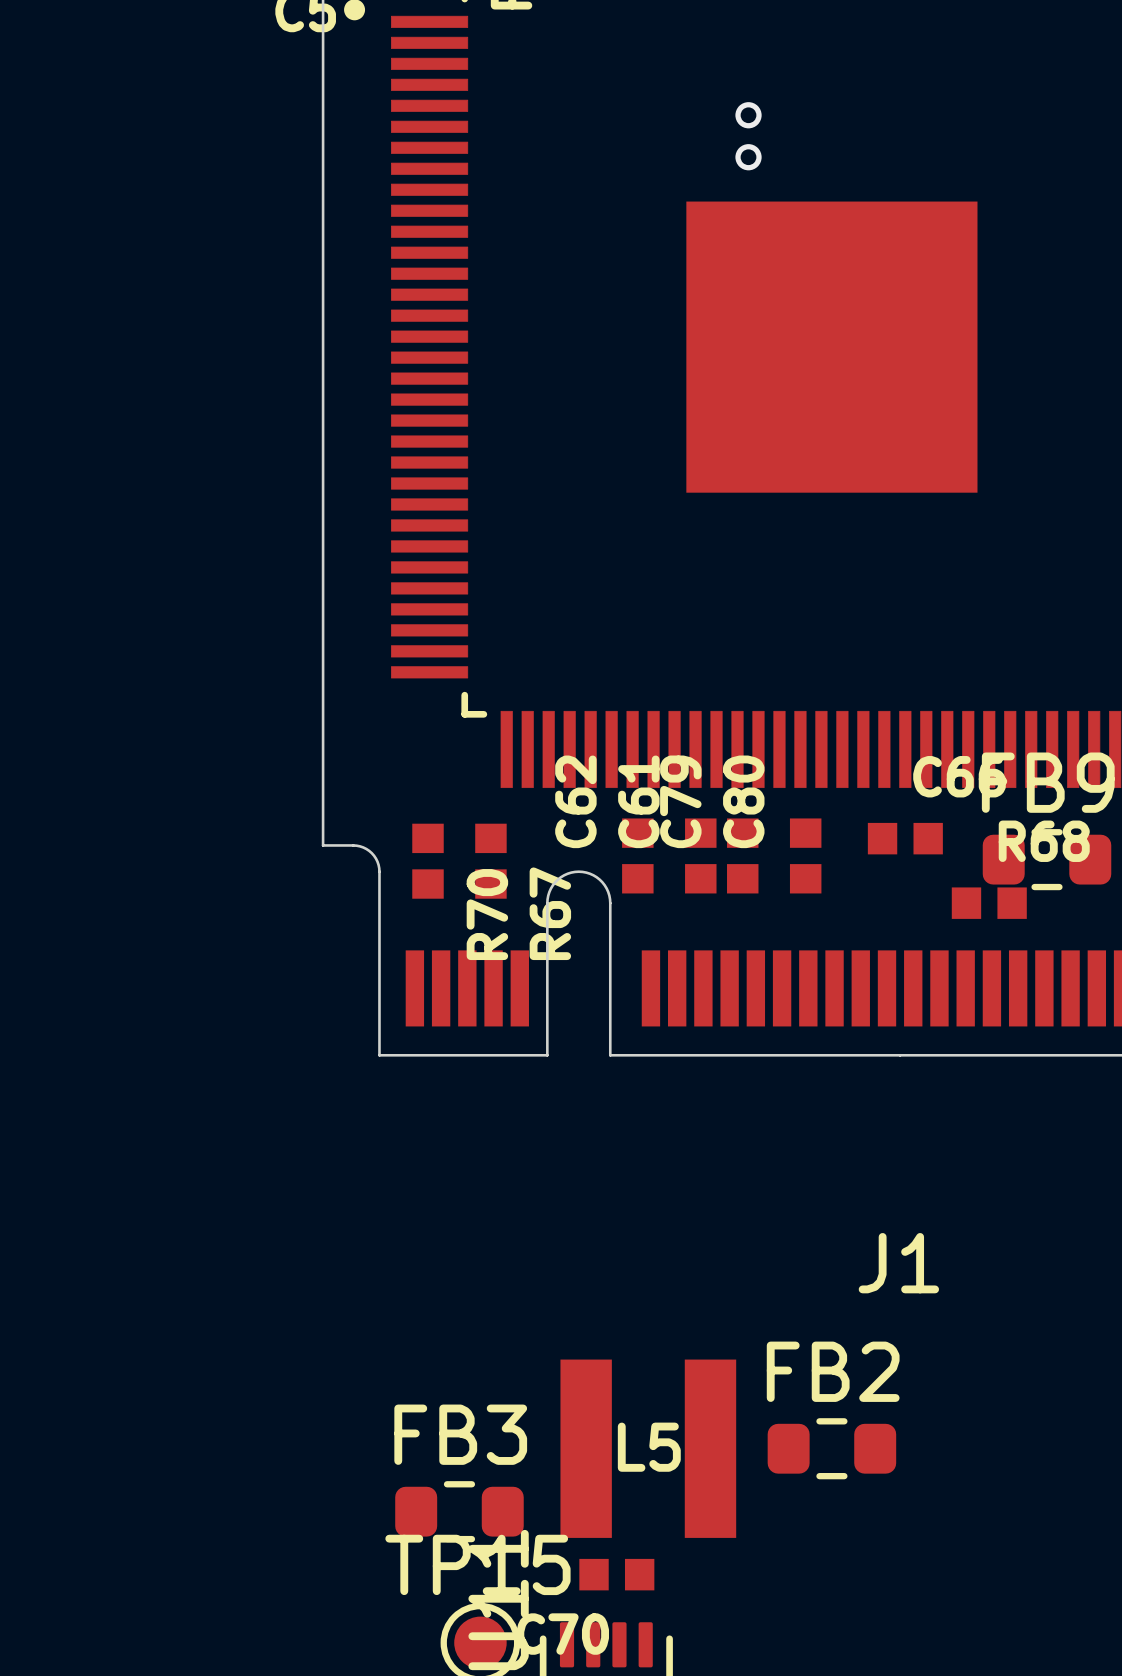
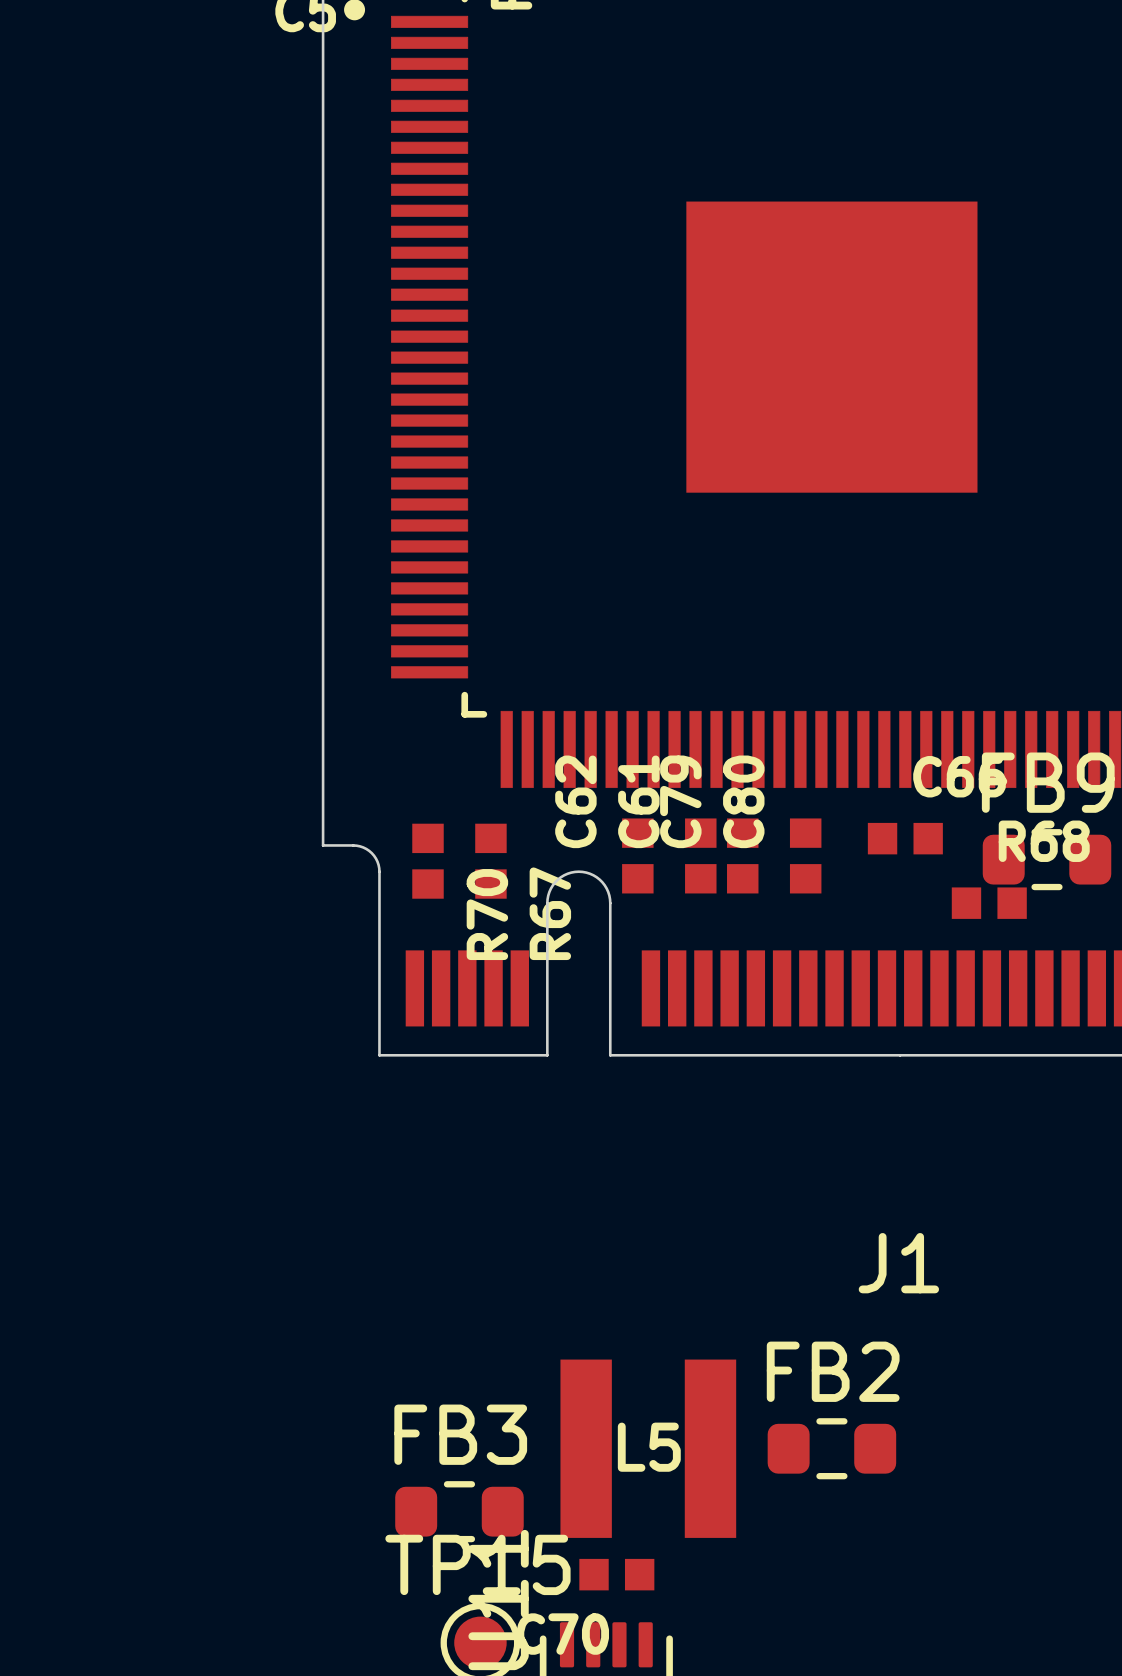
via: (748, 115) -> none
via: (748, 157) -> none

